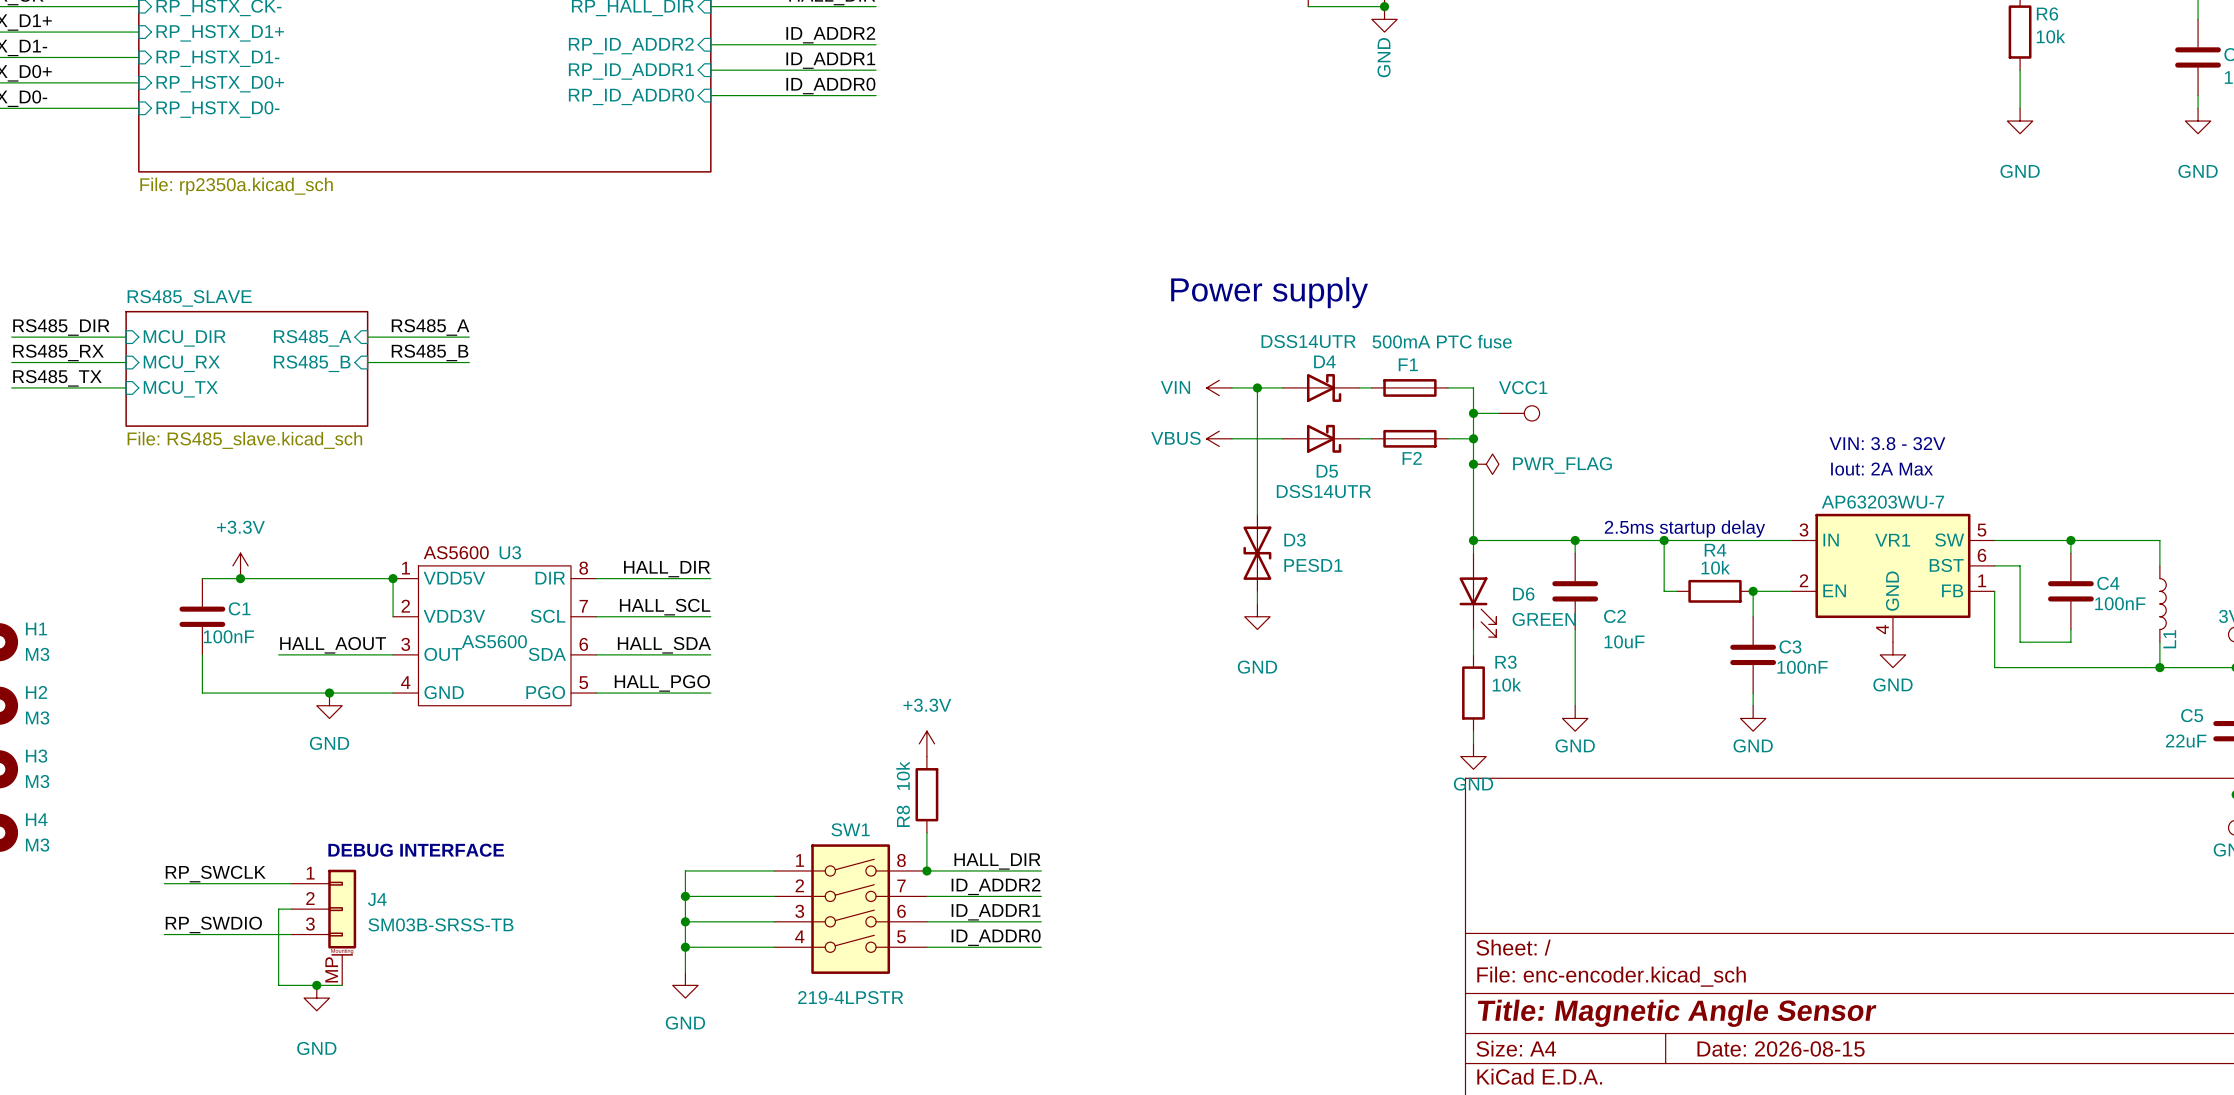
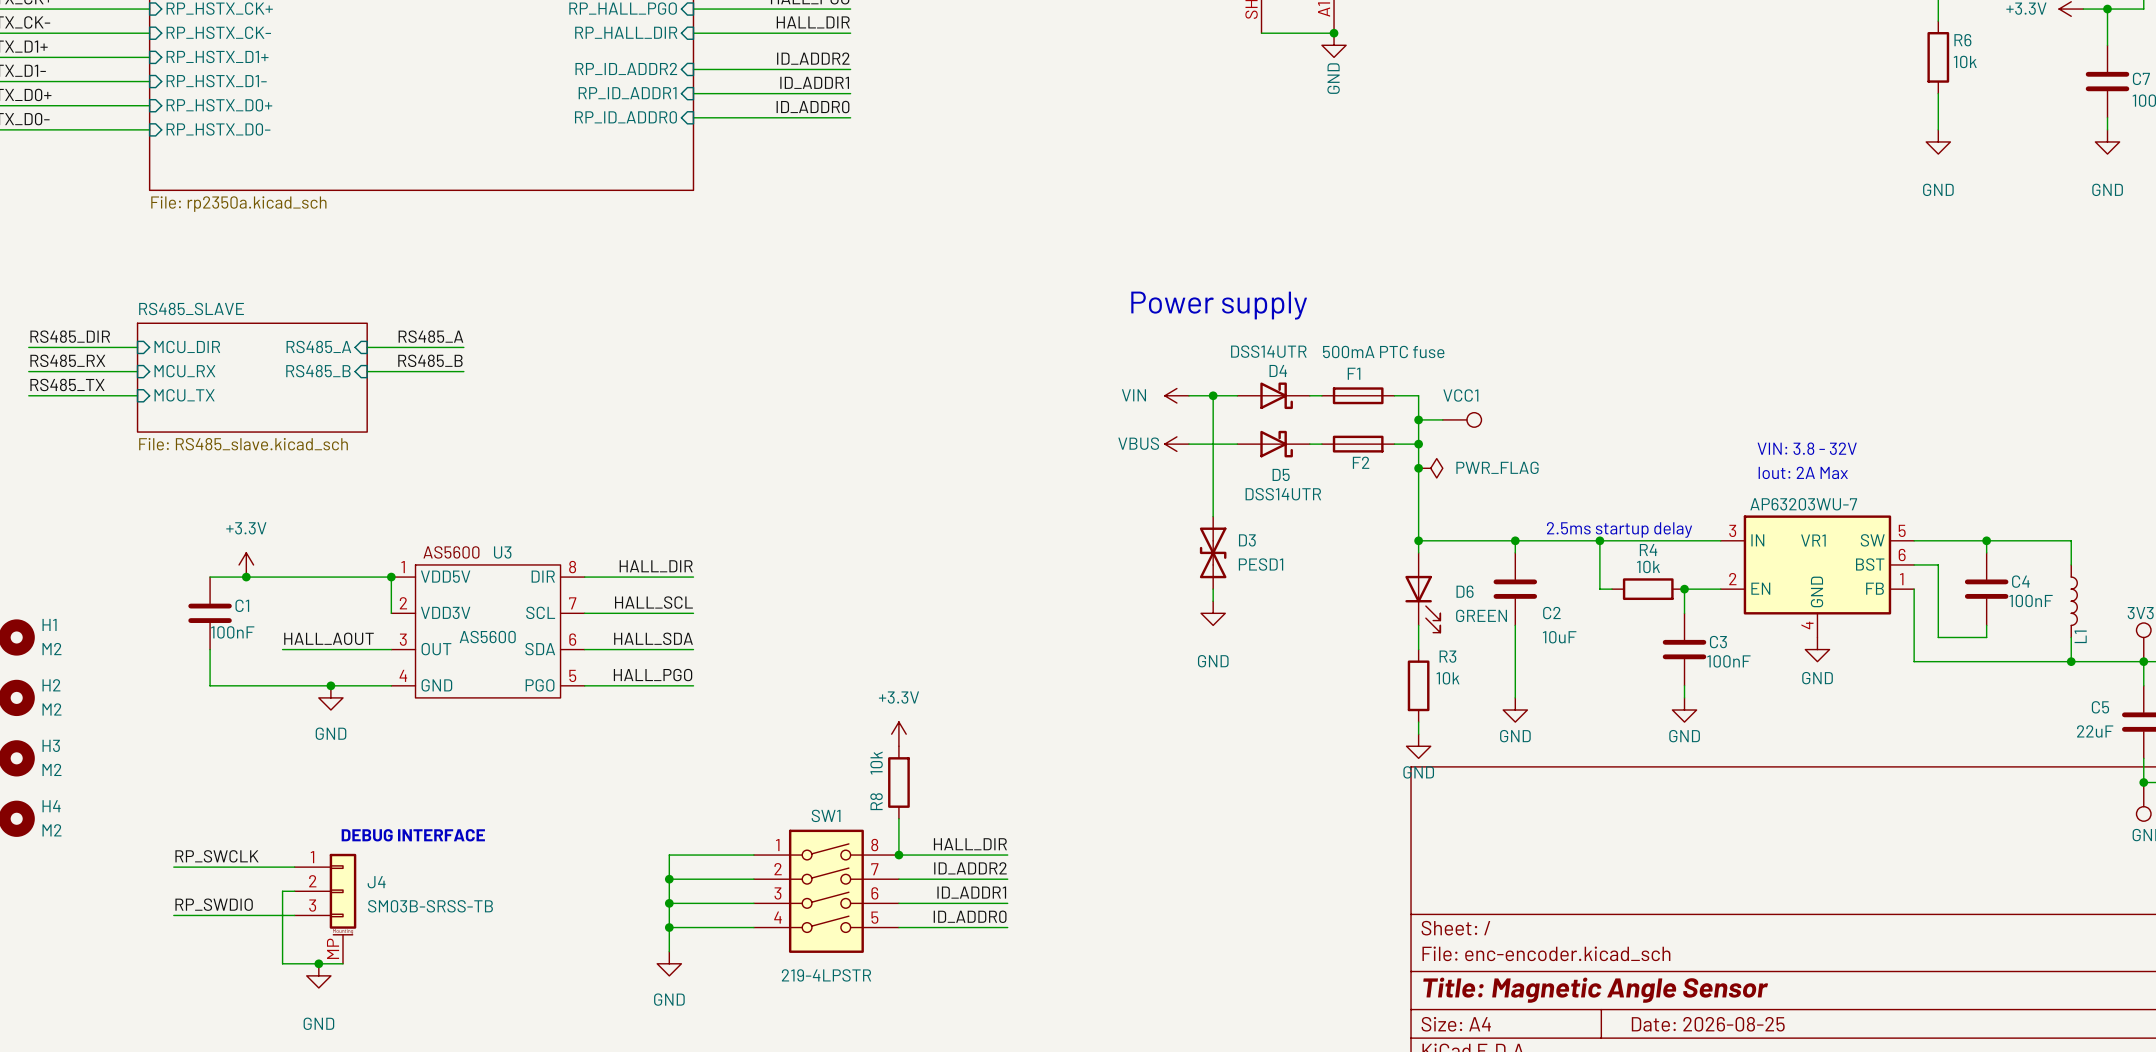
H1 value: M3 (37, 654) -> M2 (51, 649)
H2 value: M3 (37, 717) -> M2 (51, 709)
H3 value: M3 (37, 781) -> M2 (51, 769)
H4 value: M3 (37, 845) -> M2 (51, 830)
title block: Date: 2026-08-15 (1781, 1048) -> Date: 2026-08-25 (1708, 1024)

